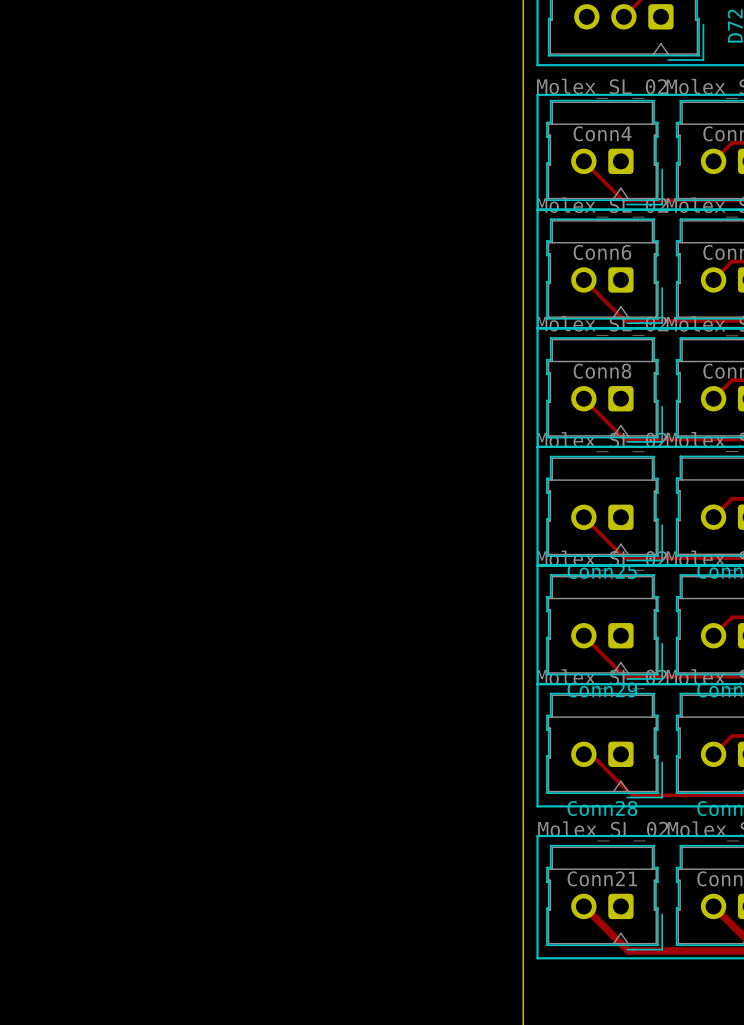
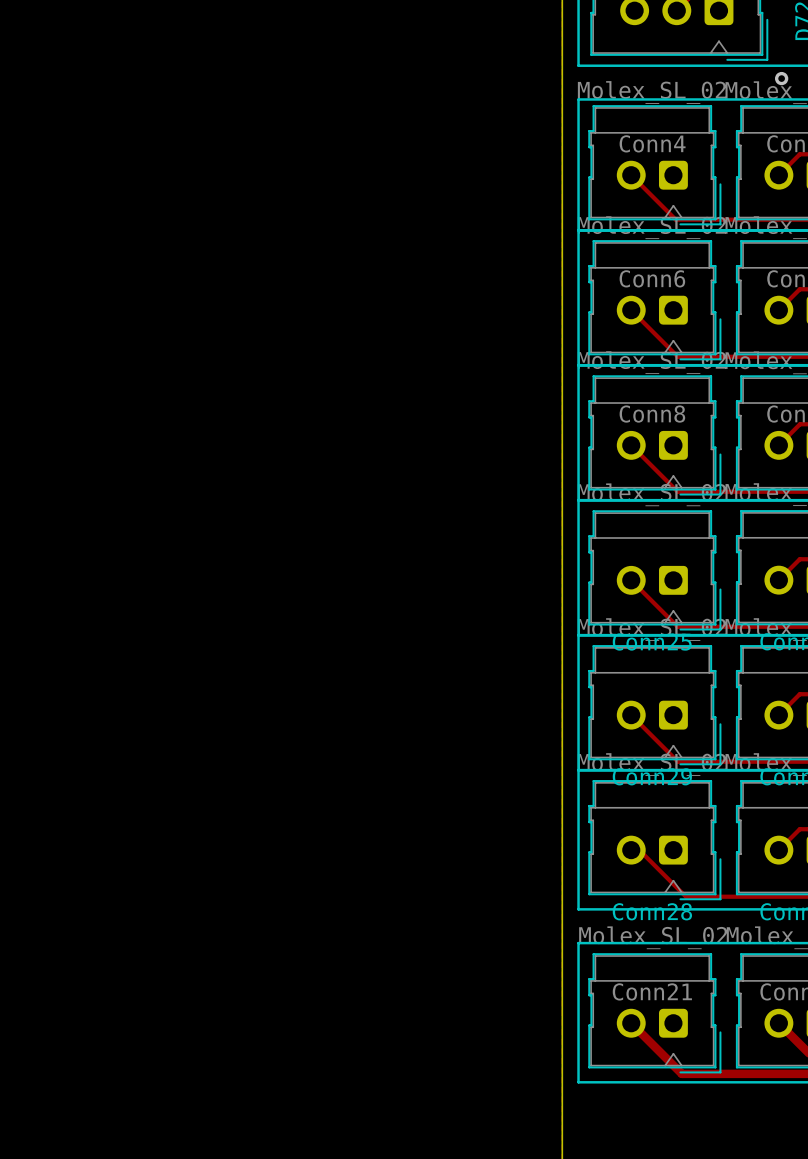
via: none -> (781, 78)

